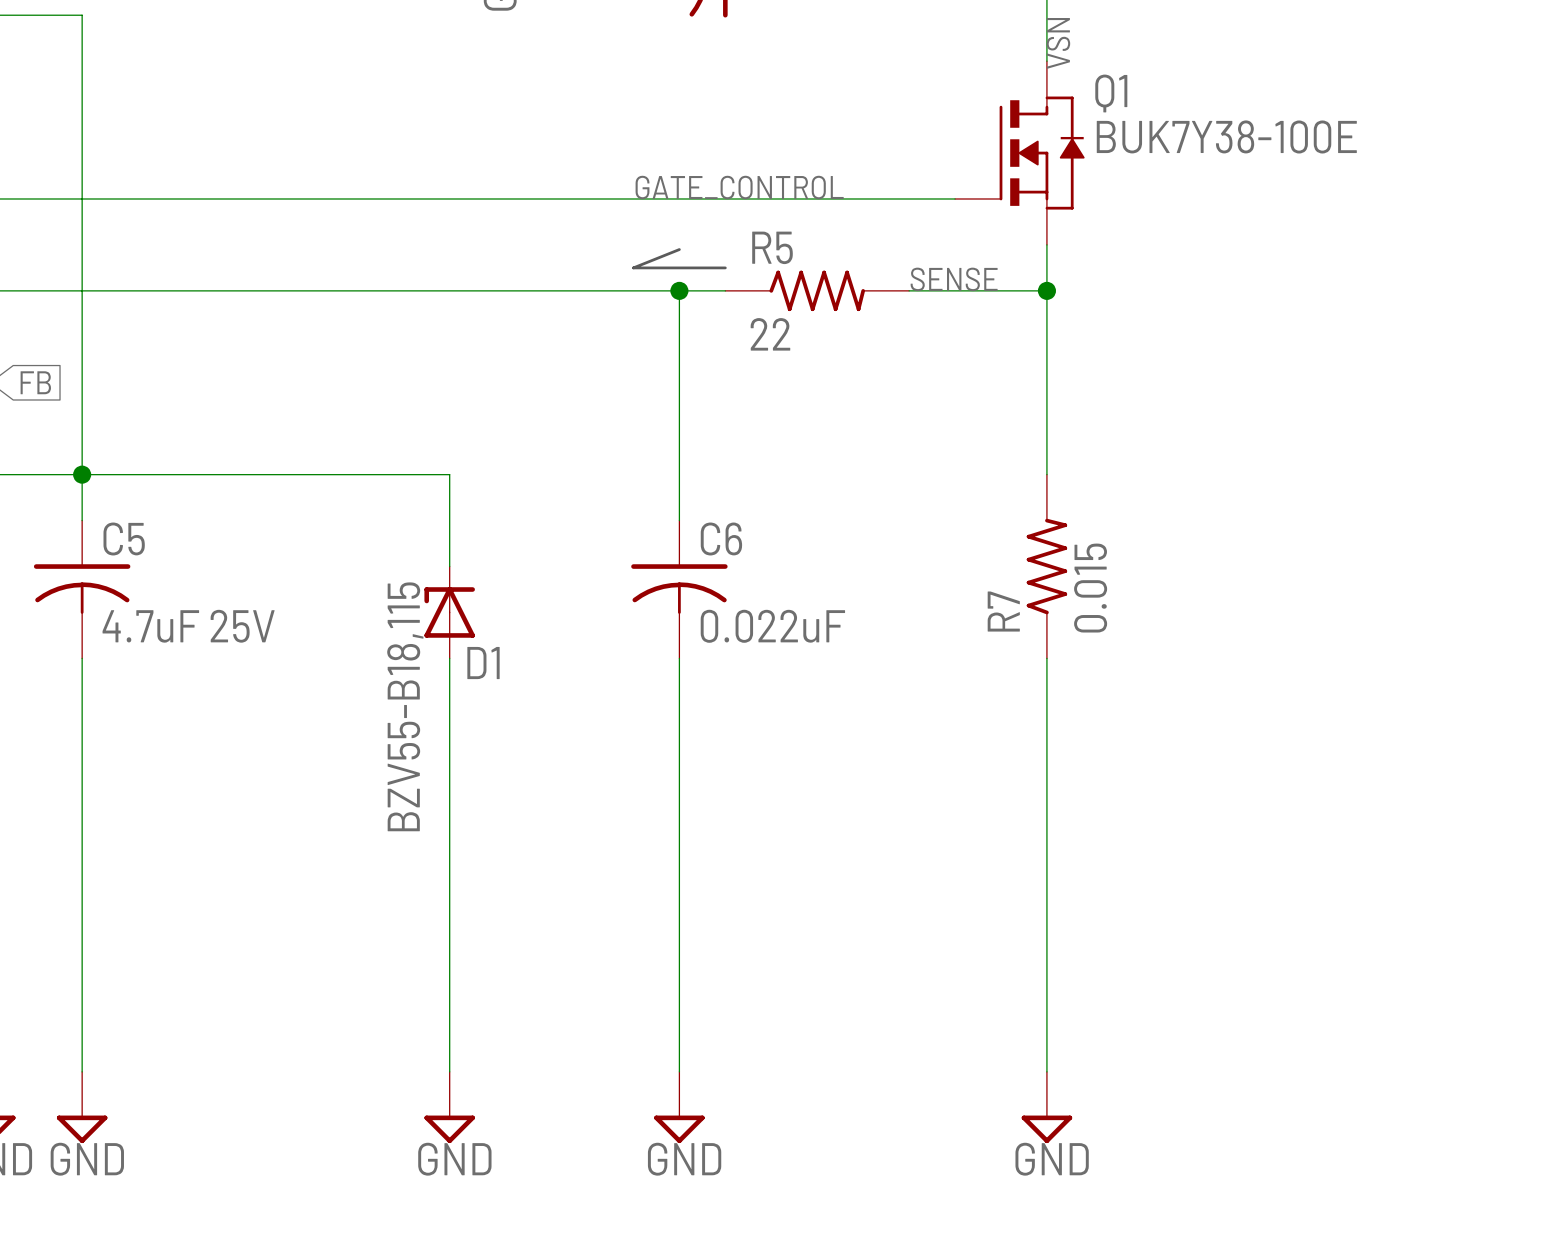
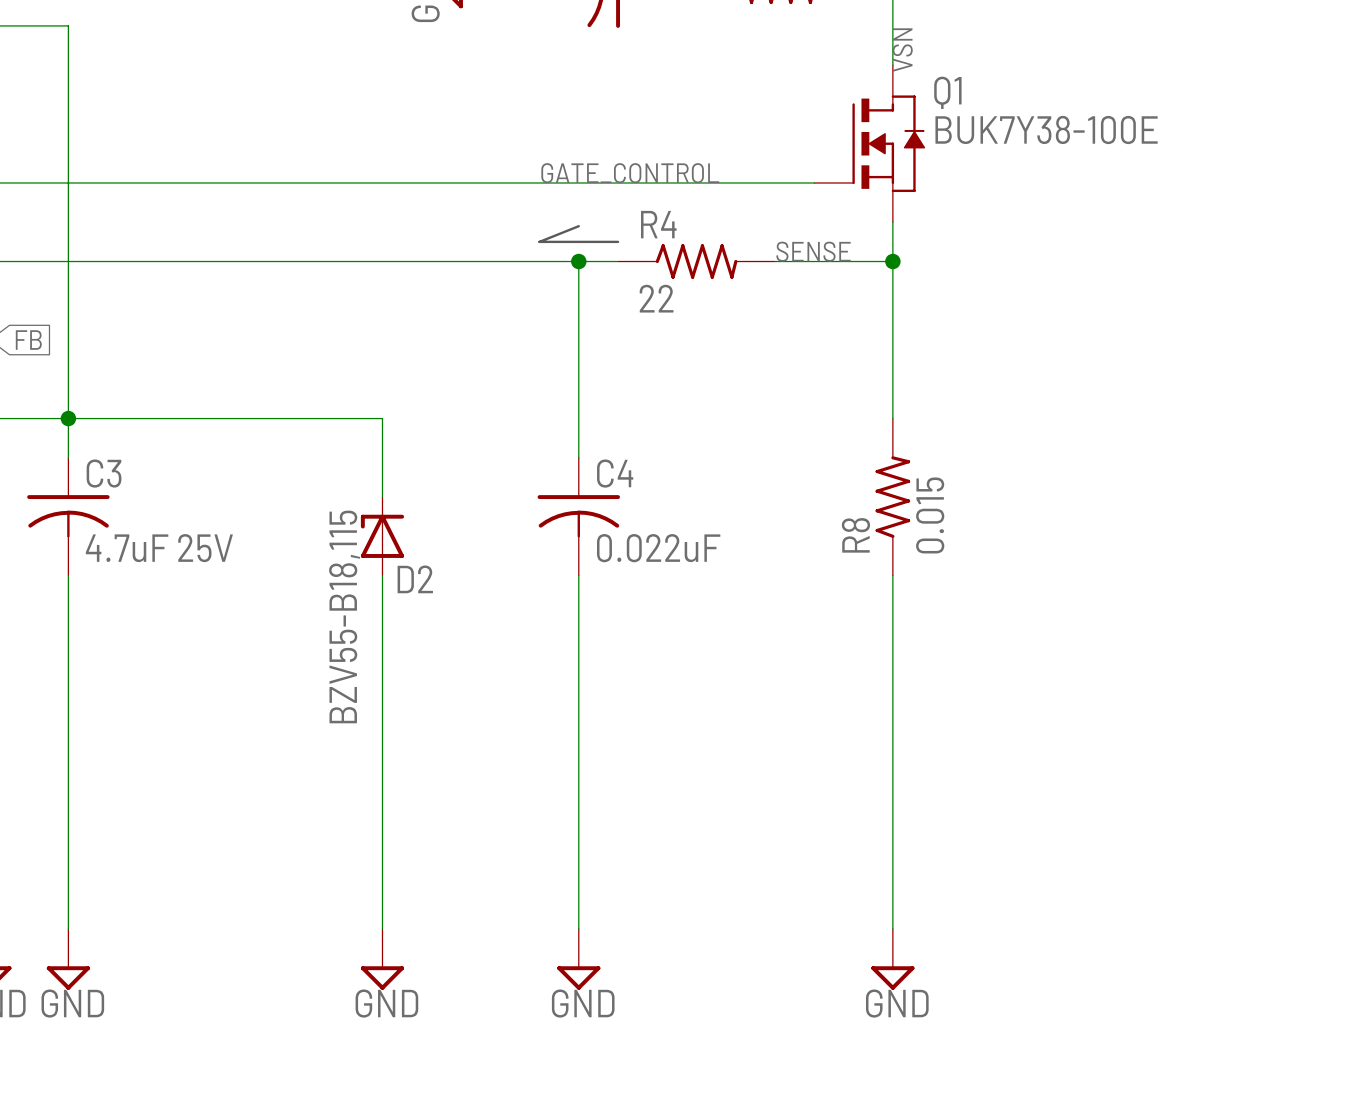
R5 name: R5 (772, 247) -> R4 (658, 224)
C5 name: C5 (124, 538) -> C3 (104, 473)
C6 name: C6 (721, 538) -> C4 (615, 473)
R7 name: R7 (1003, 611) -> R8 (855, 535)
D1 name: D1 (483, 663) -> D2 (415, 579)

